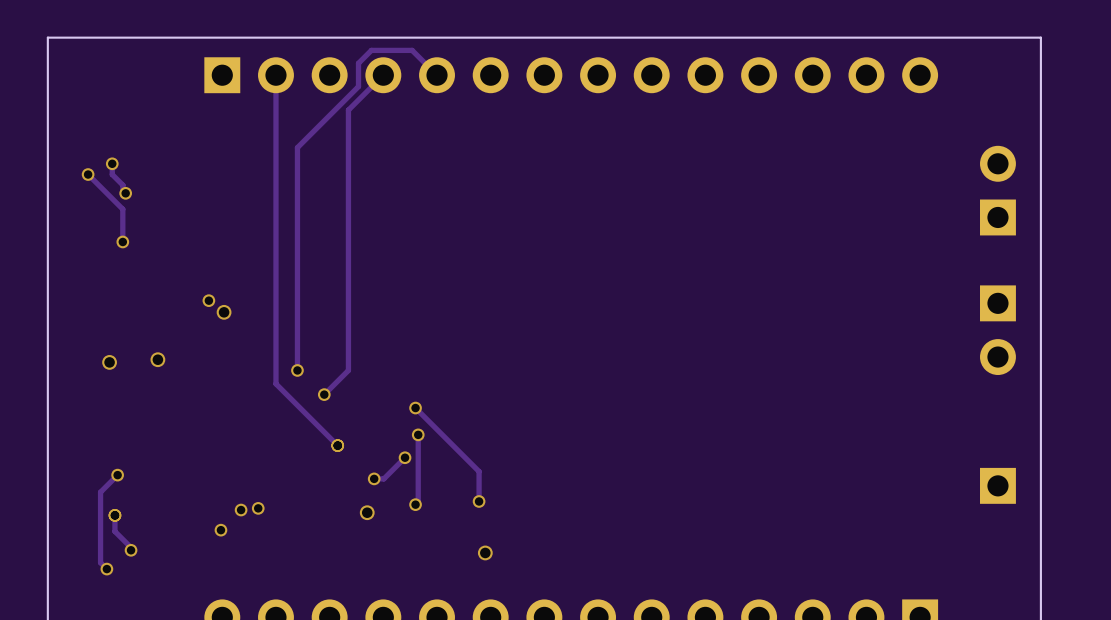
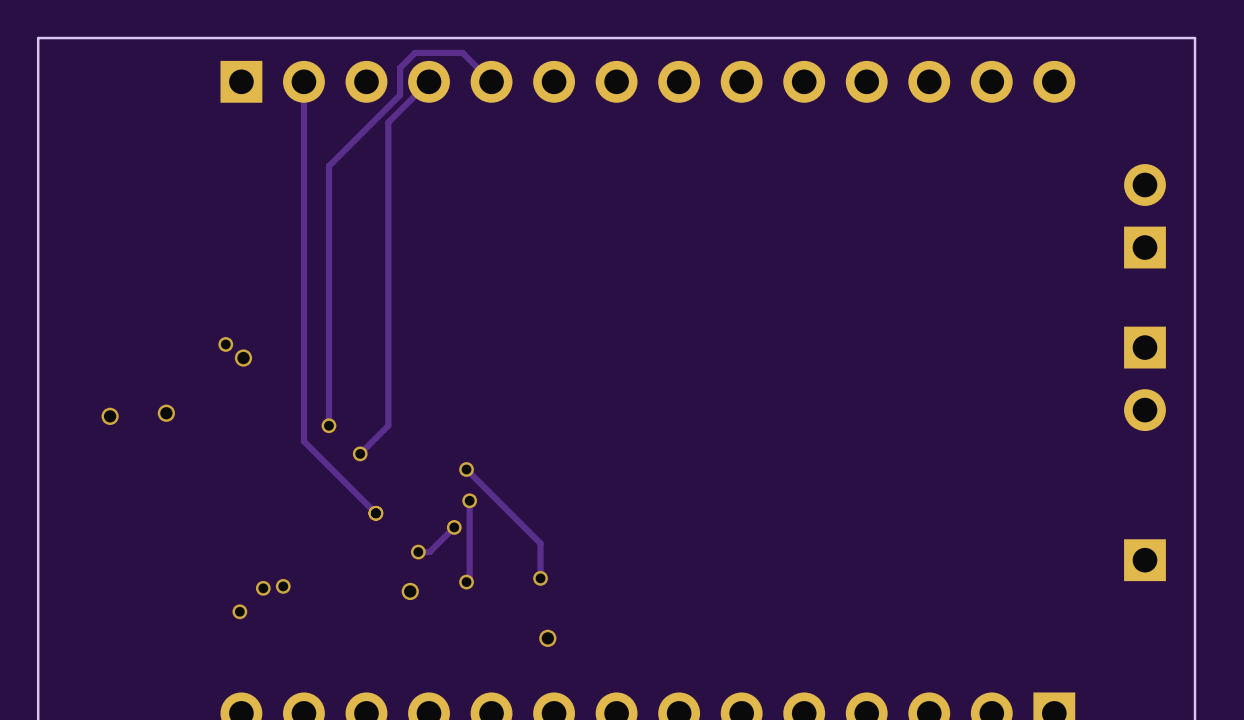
track: (112, 163) (112, 174) (122, 185) (122, 190) -> none
via: (112, 163) -> none
track: (88, 174) (122, 209) (122, 241) -> none
via: (88, 174) -> none
via: (125, 193) -> none
via: (122, 241) -> none
track: (117, 475) (100, 492) (100, 562) (106, 569) -> none
via: (117, 475) -> none
track: (114, 515) (114, 531) (131, 547) -> none
via: (114, 515) -> none
via: (131, 550) -> none
via: (106, 569) -> none

